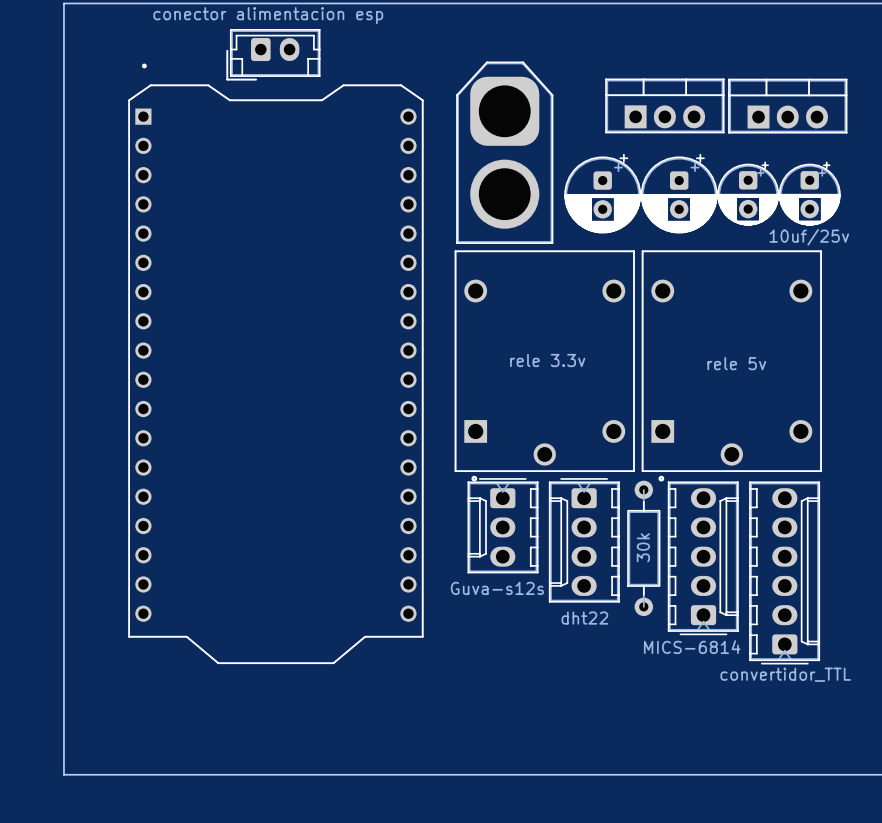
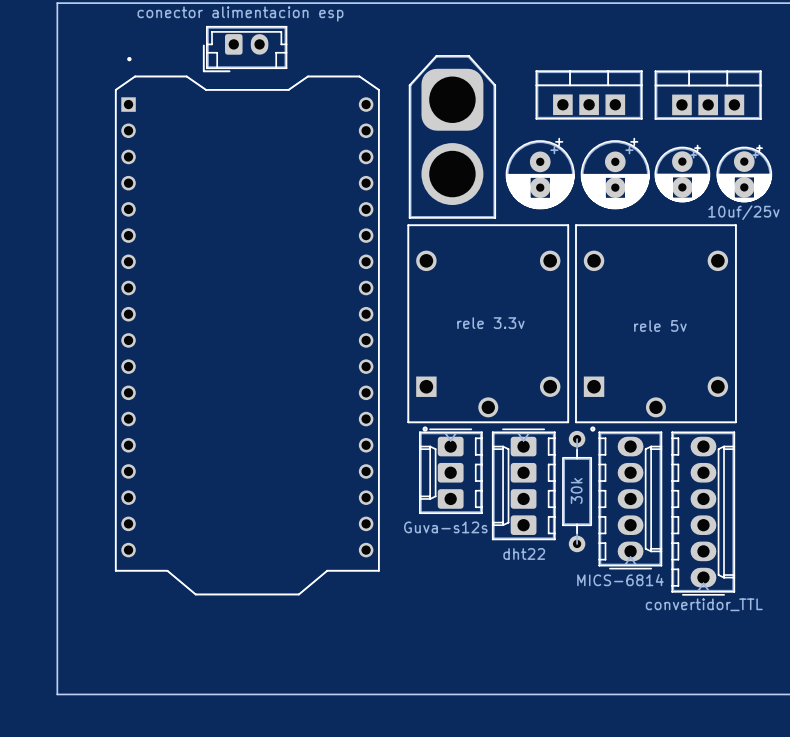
part footprint: [605, 78, 725, 134] -> [535, 70, 643, 120]
part footprint: [728, 78, 848, 134] -> [654, 70, 762, 120]
part footprint: [564, 153, 642, 234] -> [505, 138, 575, 210]
part footprint: [640, 153, 718, 234] -> [580, 138, 650, 210]
part: (748, 193) -> none
part: none -> (682, 173)
part: 10uf/25v (809, 193) -> none
part: none -> 10uf/25v (744, 173)
part footprint: [467, 478, 539, 574] -> [419, 428, 483, 514]
part footprint: [549, 478, 620, 603] -> [492, 428, 556, 541]
part footprint: [667, 481, 739, 636] -> [598, 431, 663, 570]
part footprint: [749, 481, 820, 665] -> [671, 431, 735, 596]

